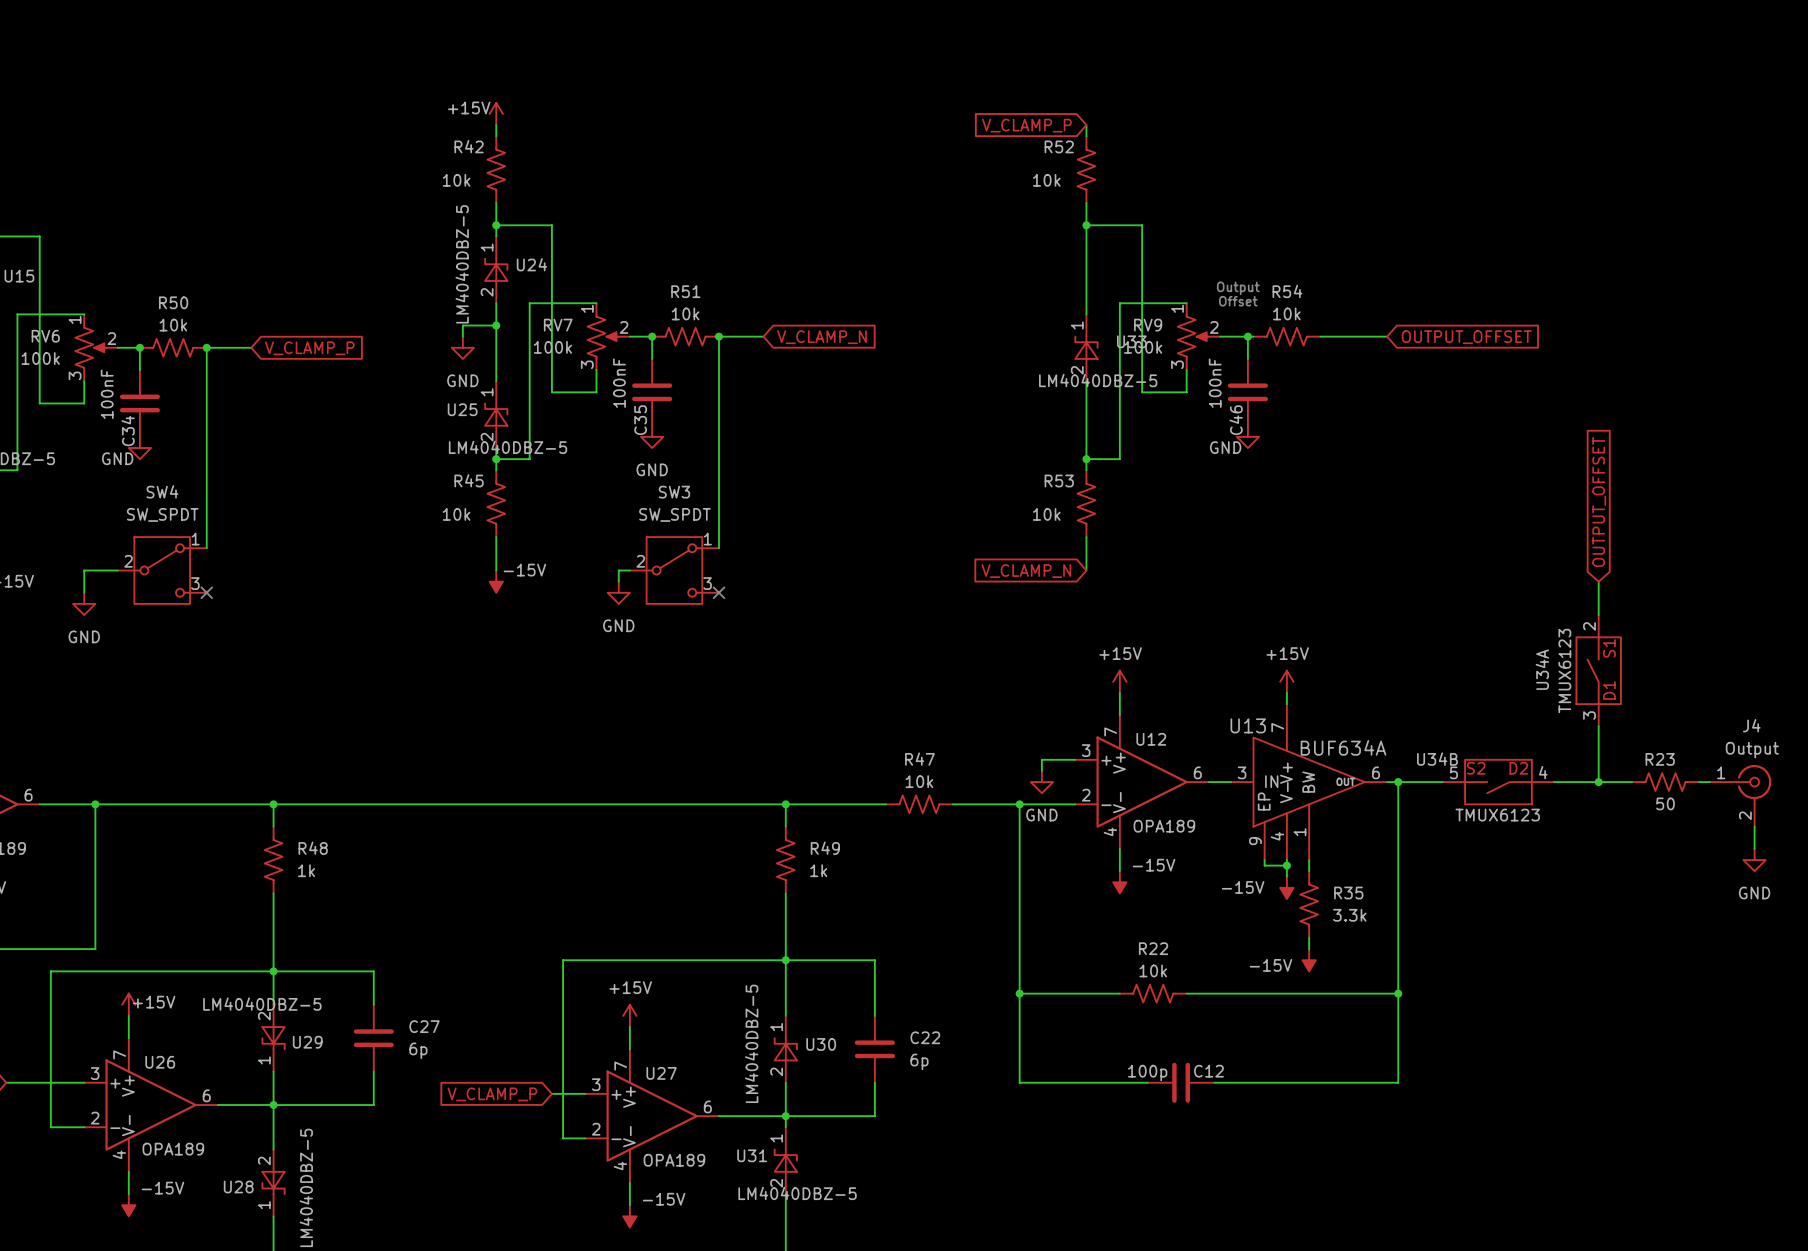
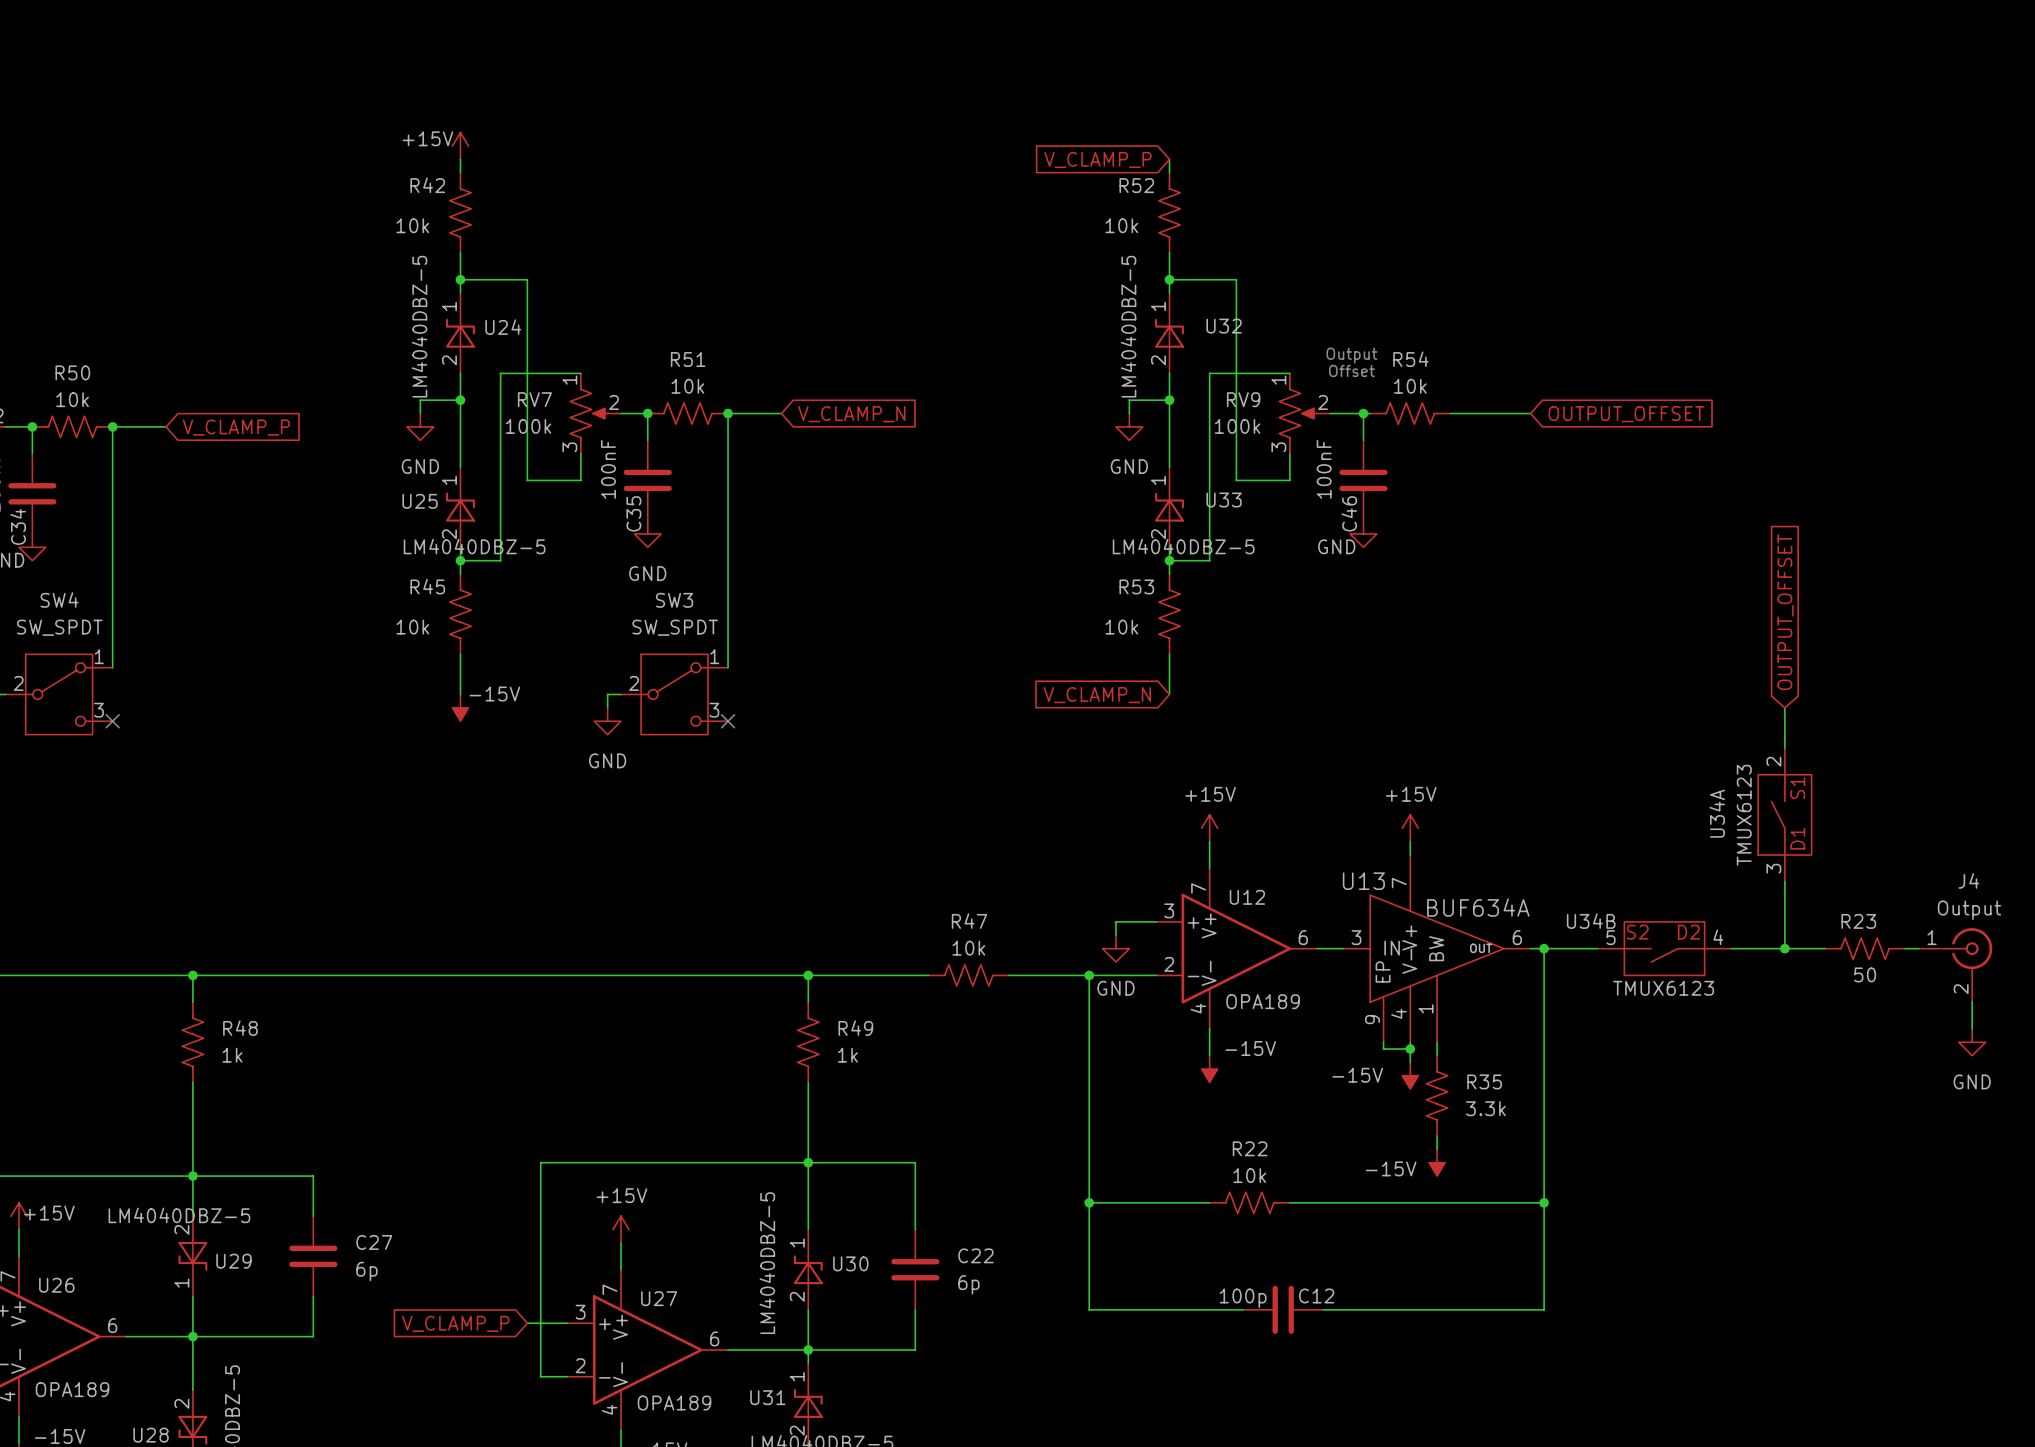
U32: none -> LM4040DBZ-5 (1169, 333)
wire: none -> (1169, 400) (1129, 400) (1129, 413)
junction: none -> (1169, 400)
power symbol: none -> GND (1129, 426)
U33 position: (1086, 347) -> (1169, 507)

